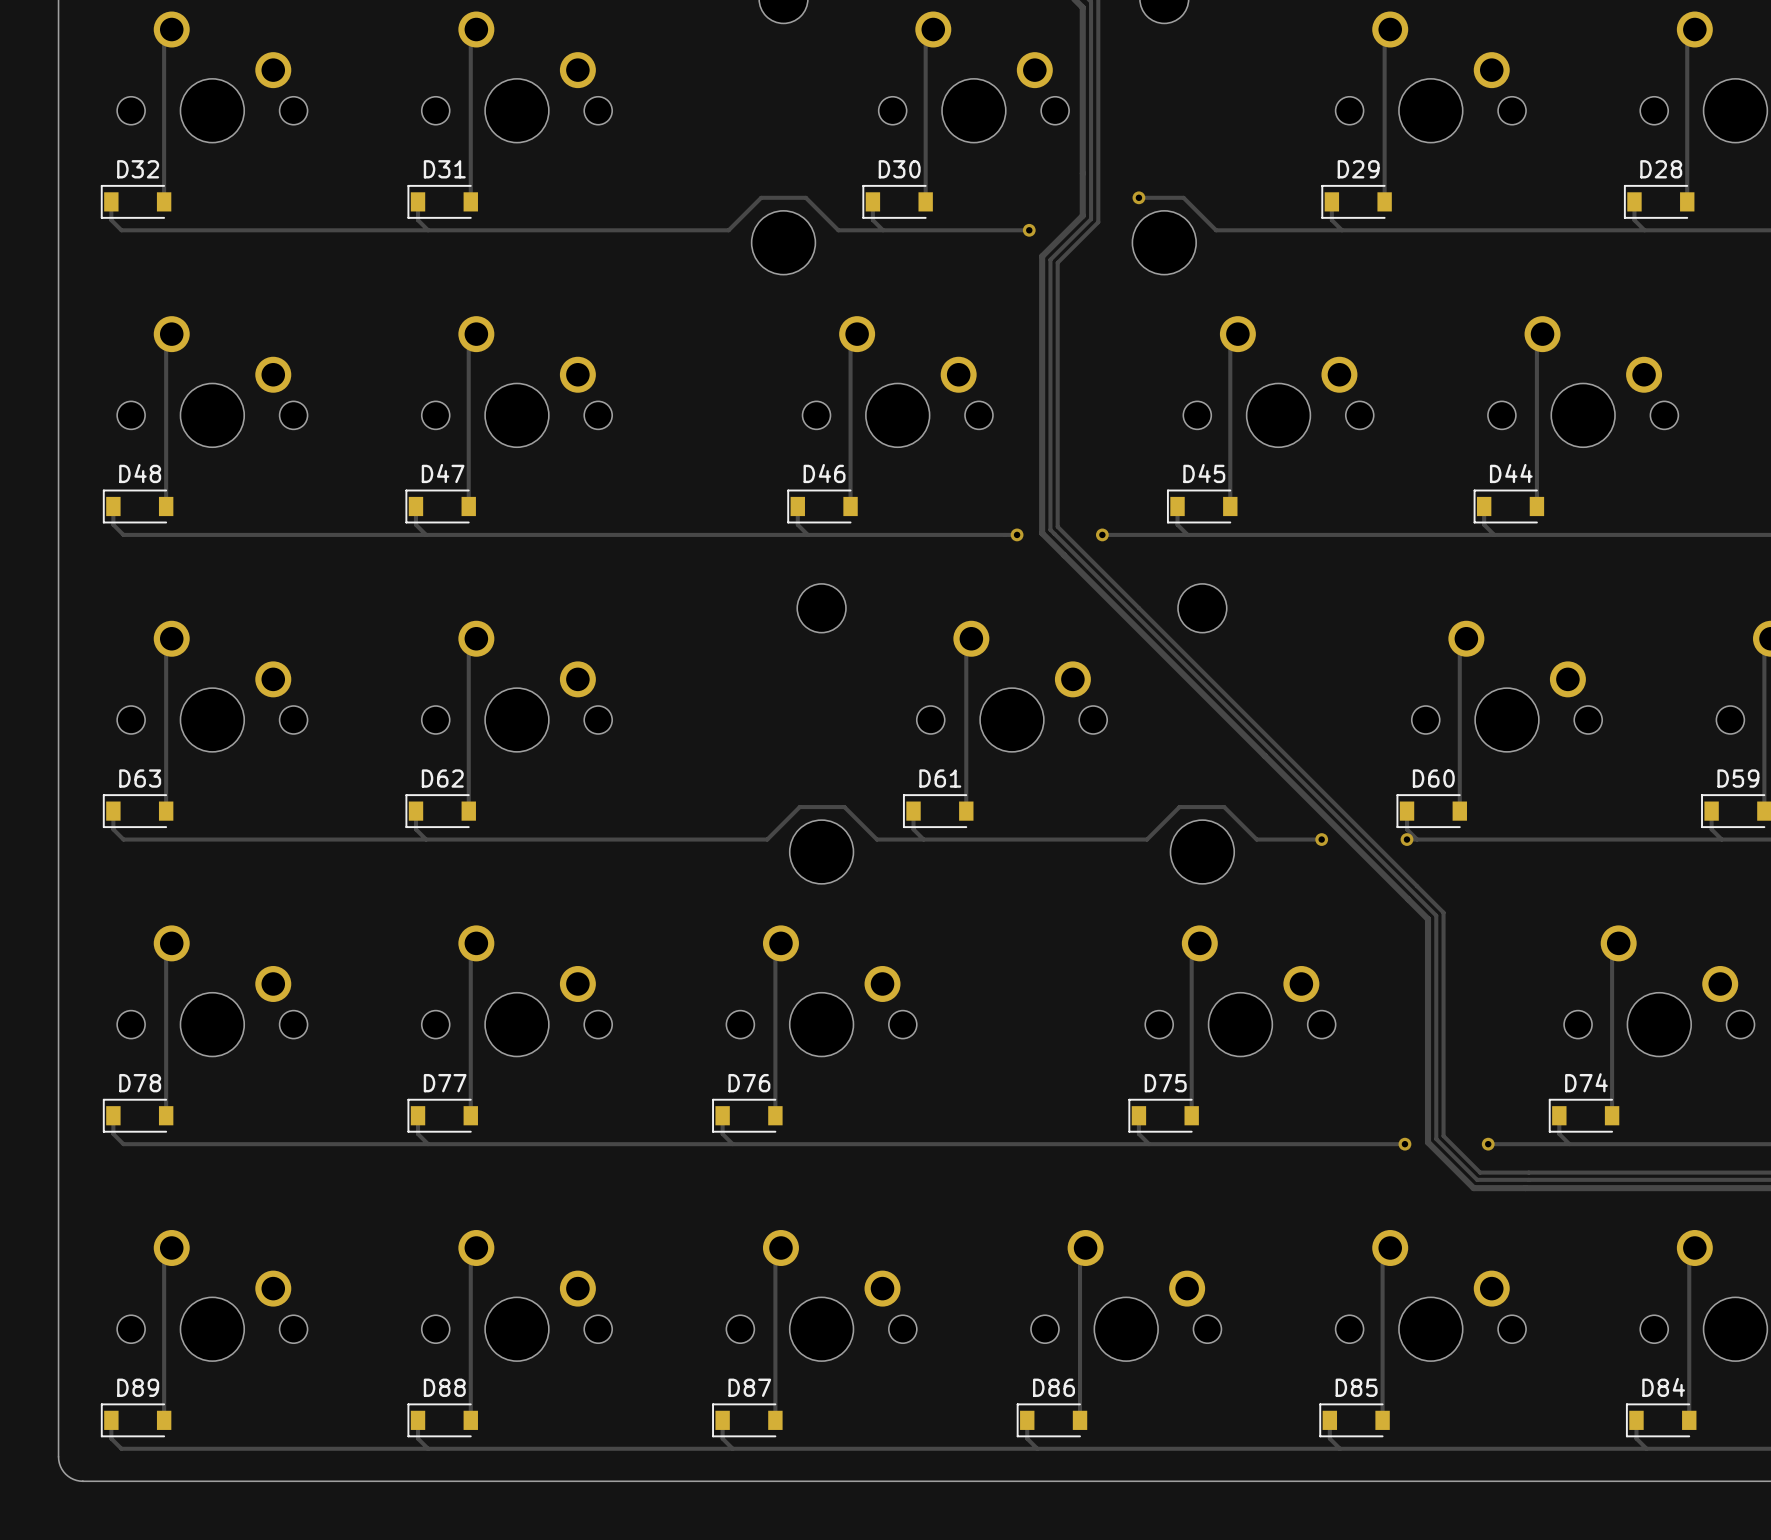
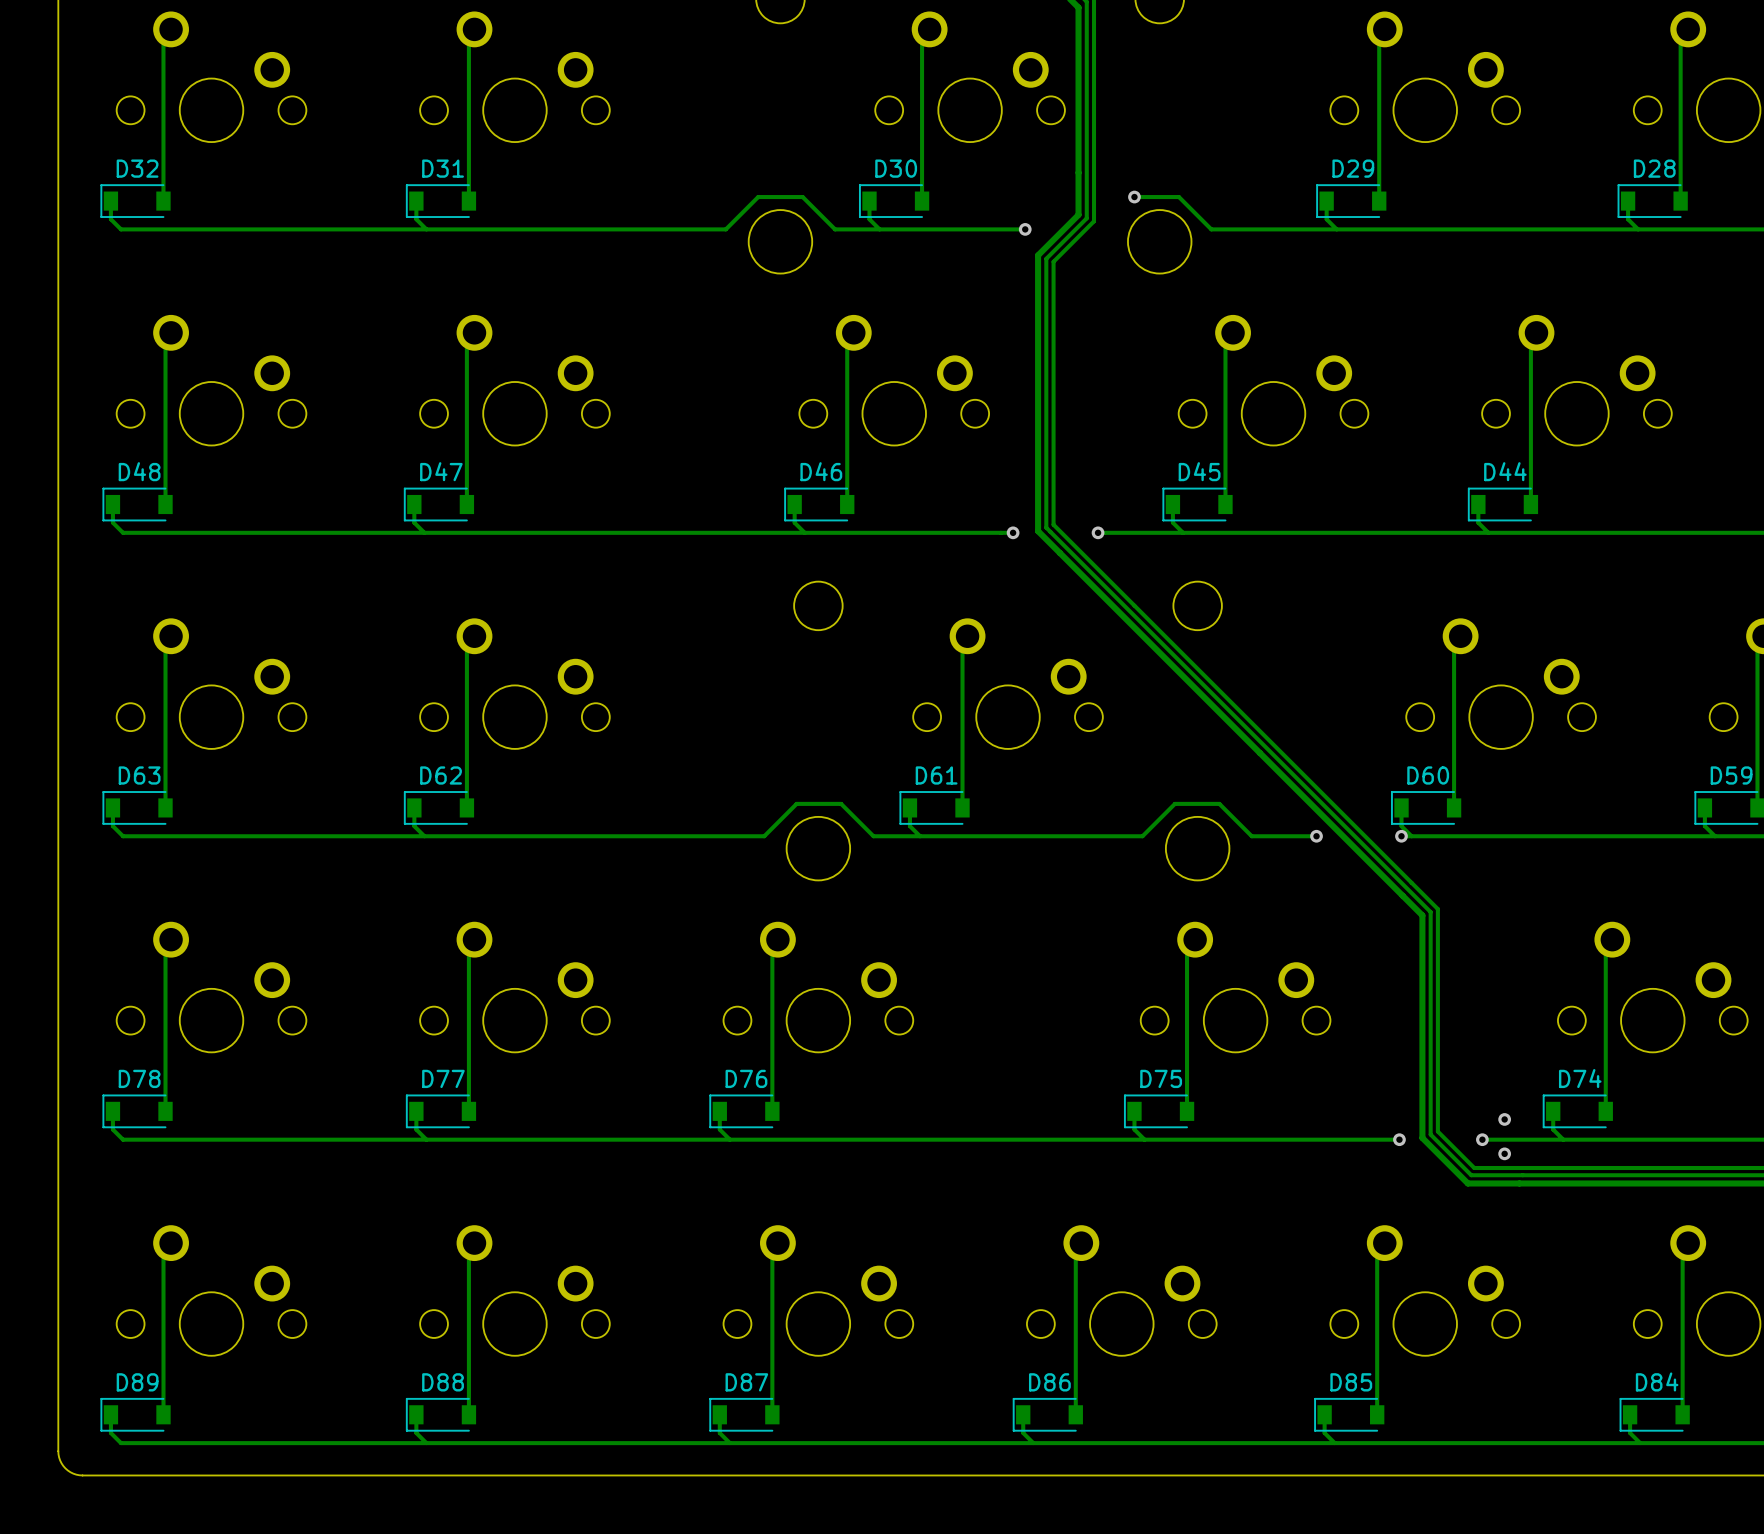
via: none -> (1504, 1119)
via: none -> (1504, 1153)

